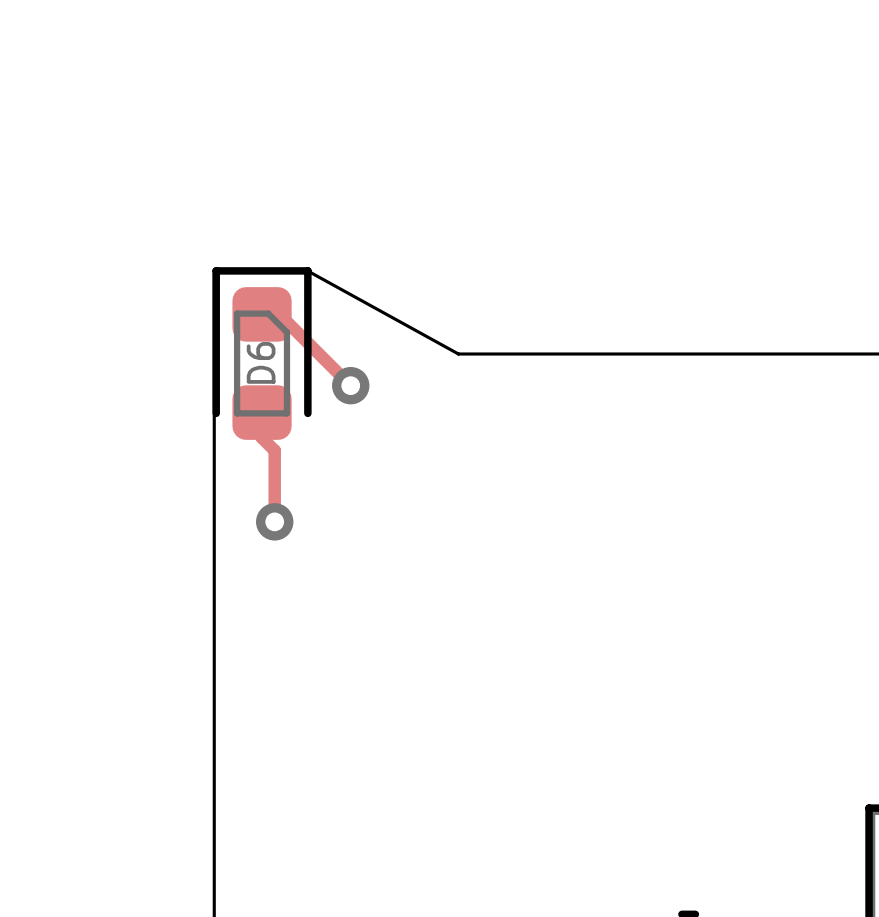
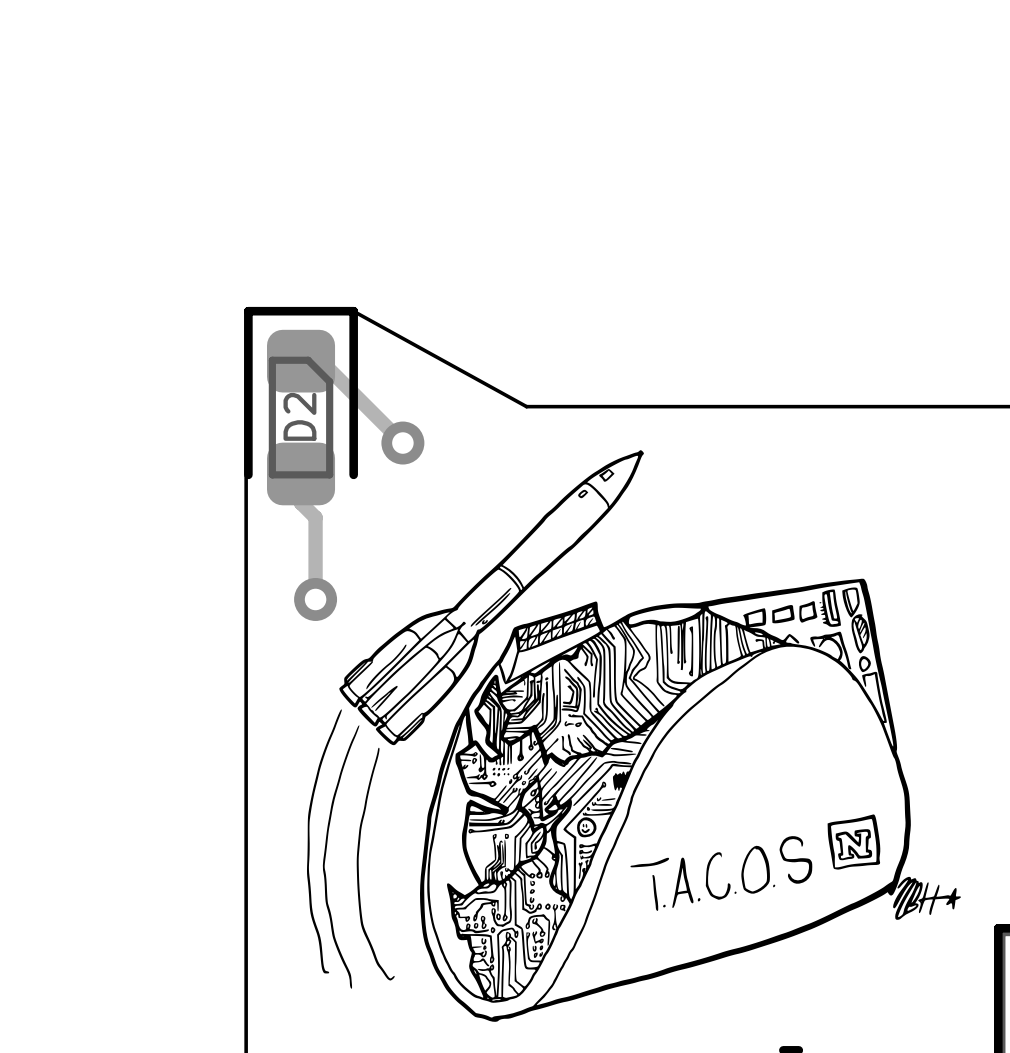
D6 name: D6 (261, 362) -> D2 (299, 416)
drawing: none -> [306, 450, 961, 1022]

